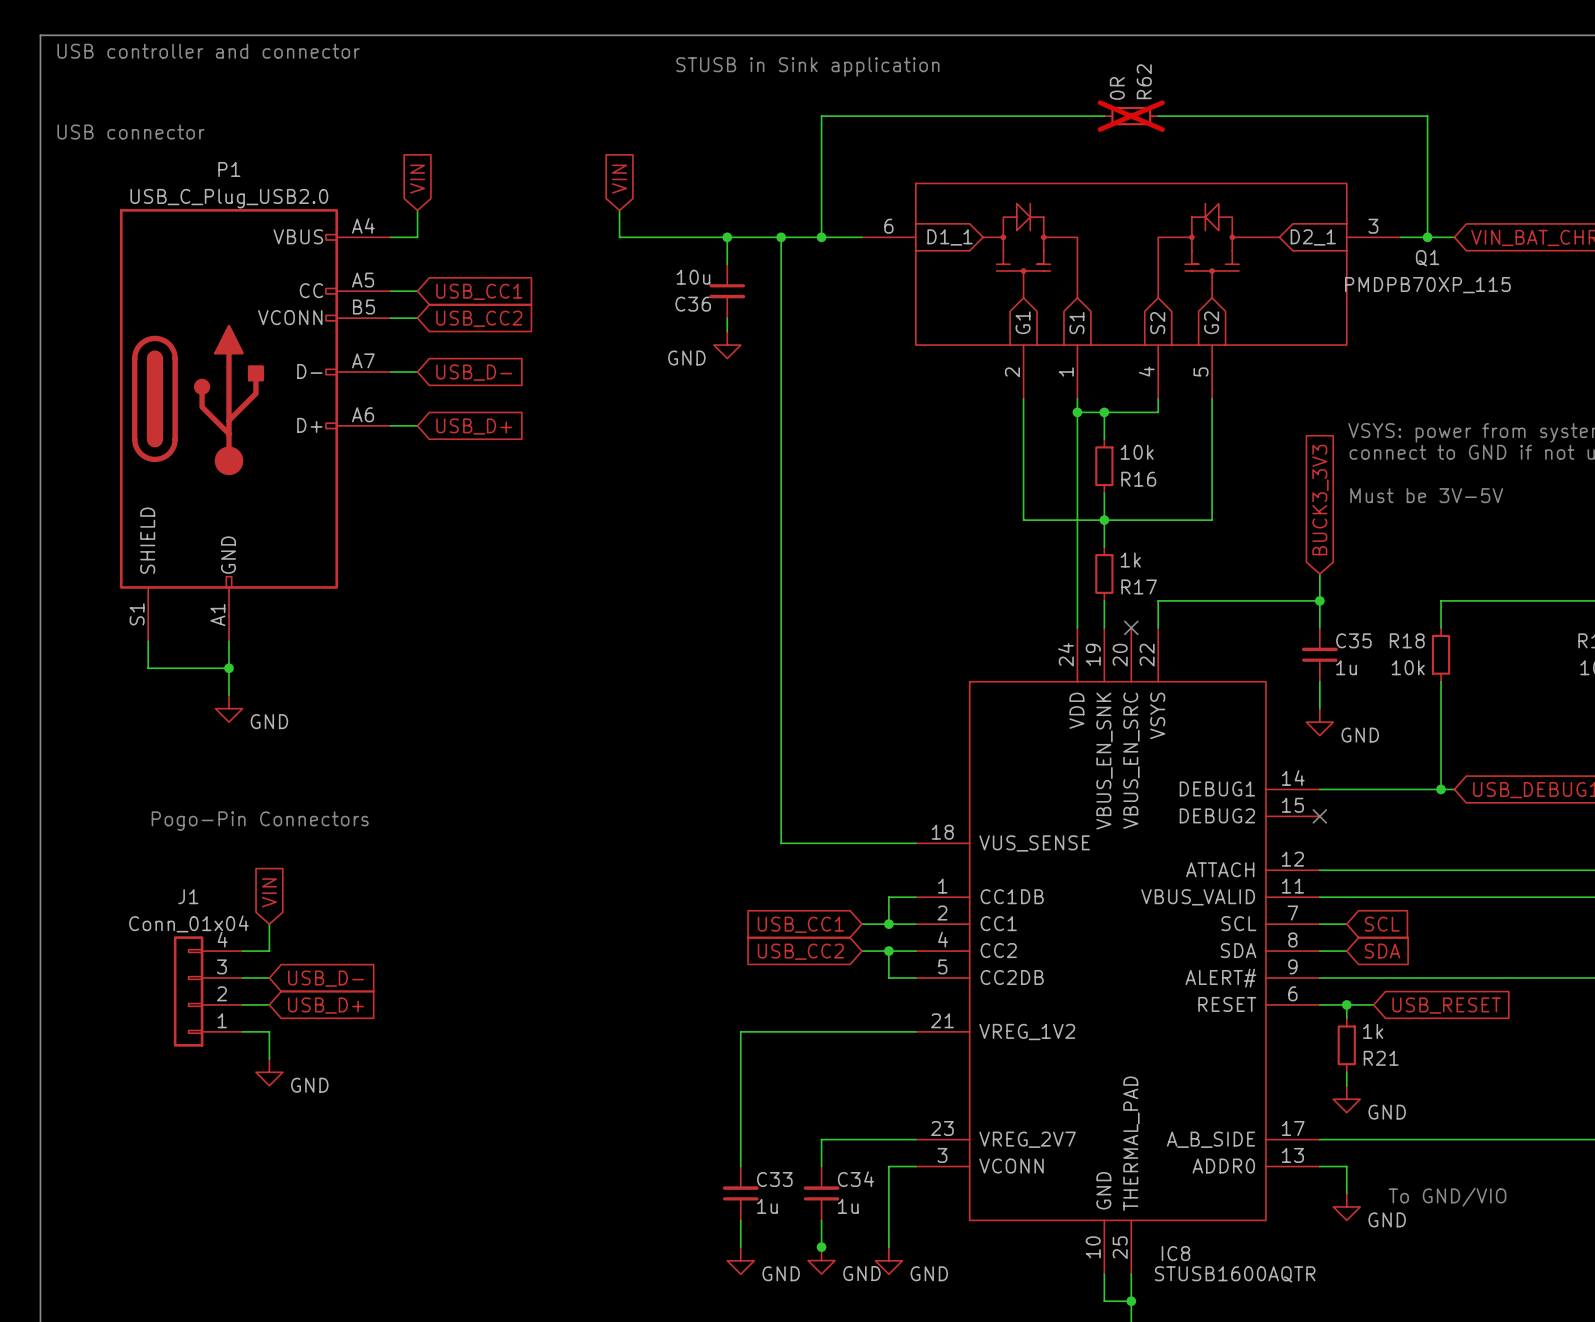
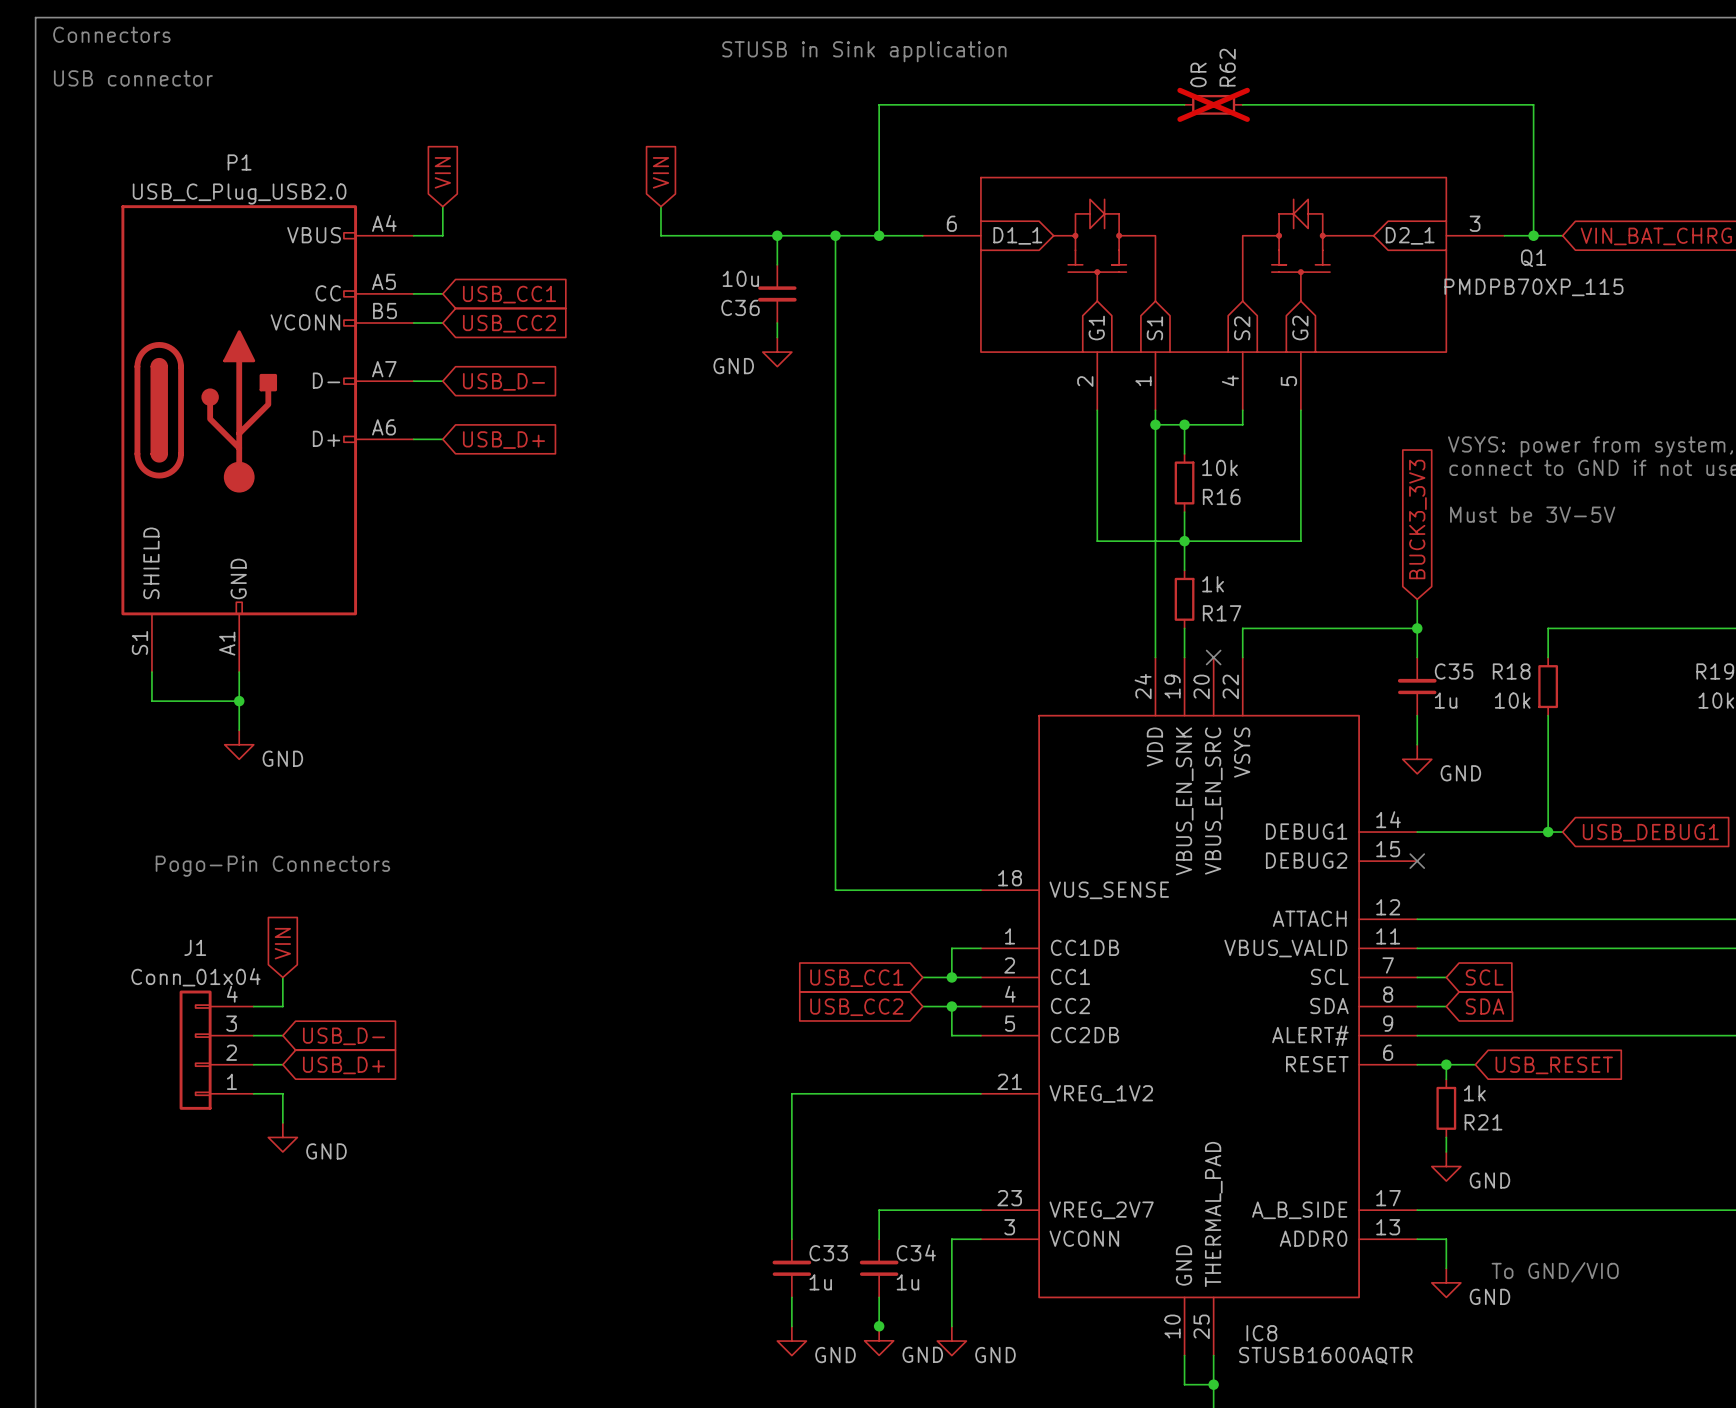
text: USB controller and connector (208, 51) -> Connectors (111, 34)
text position: USB connector (130, 132) -> USB connector (133, 78)

